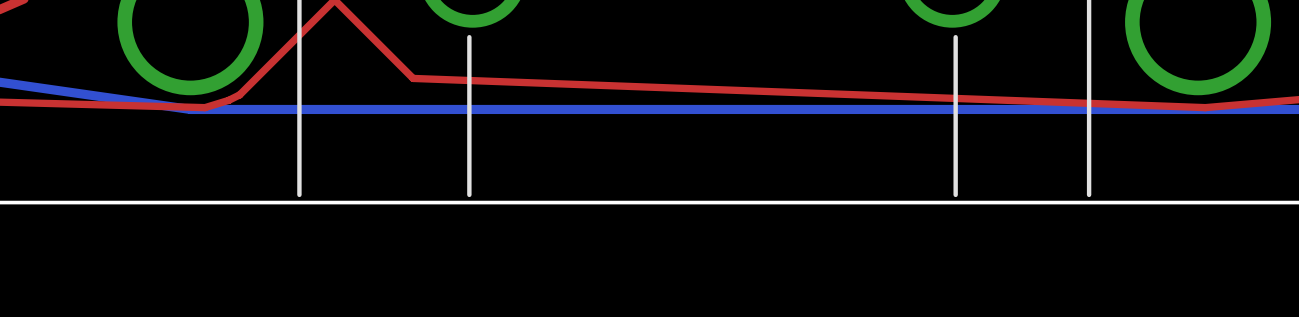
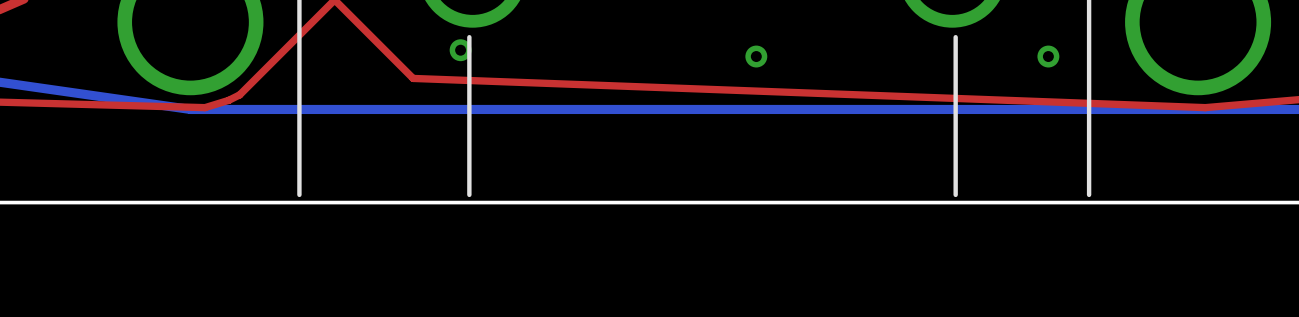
via: none -> (460, 50)
via: none -> (756, 56)
via: none -> (1048, 56)

